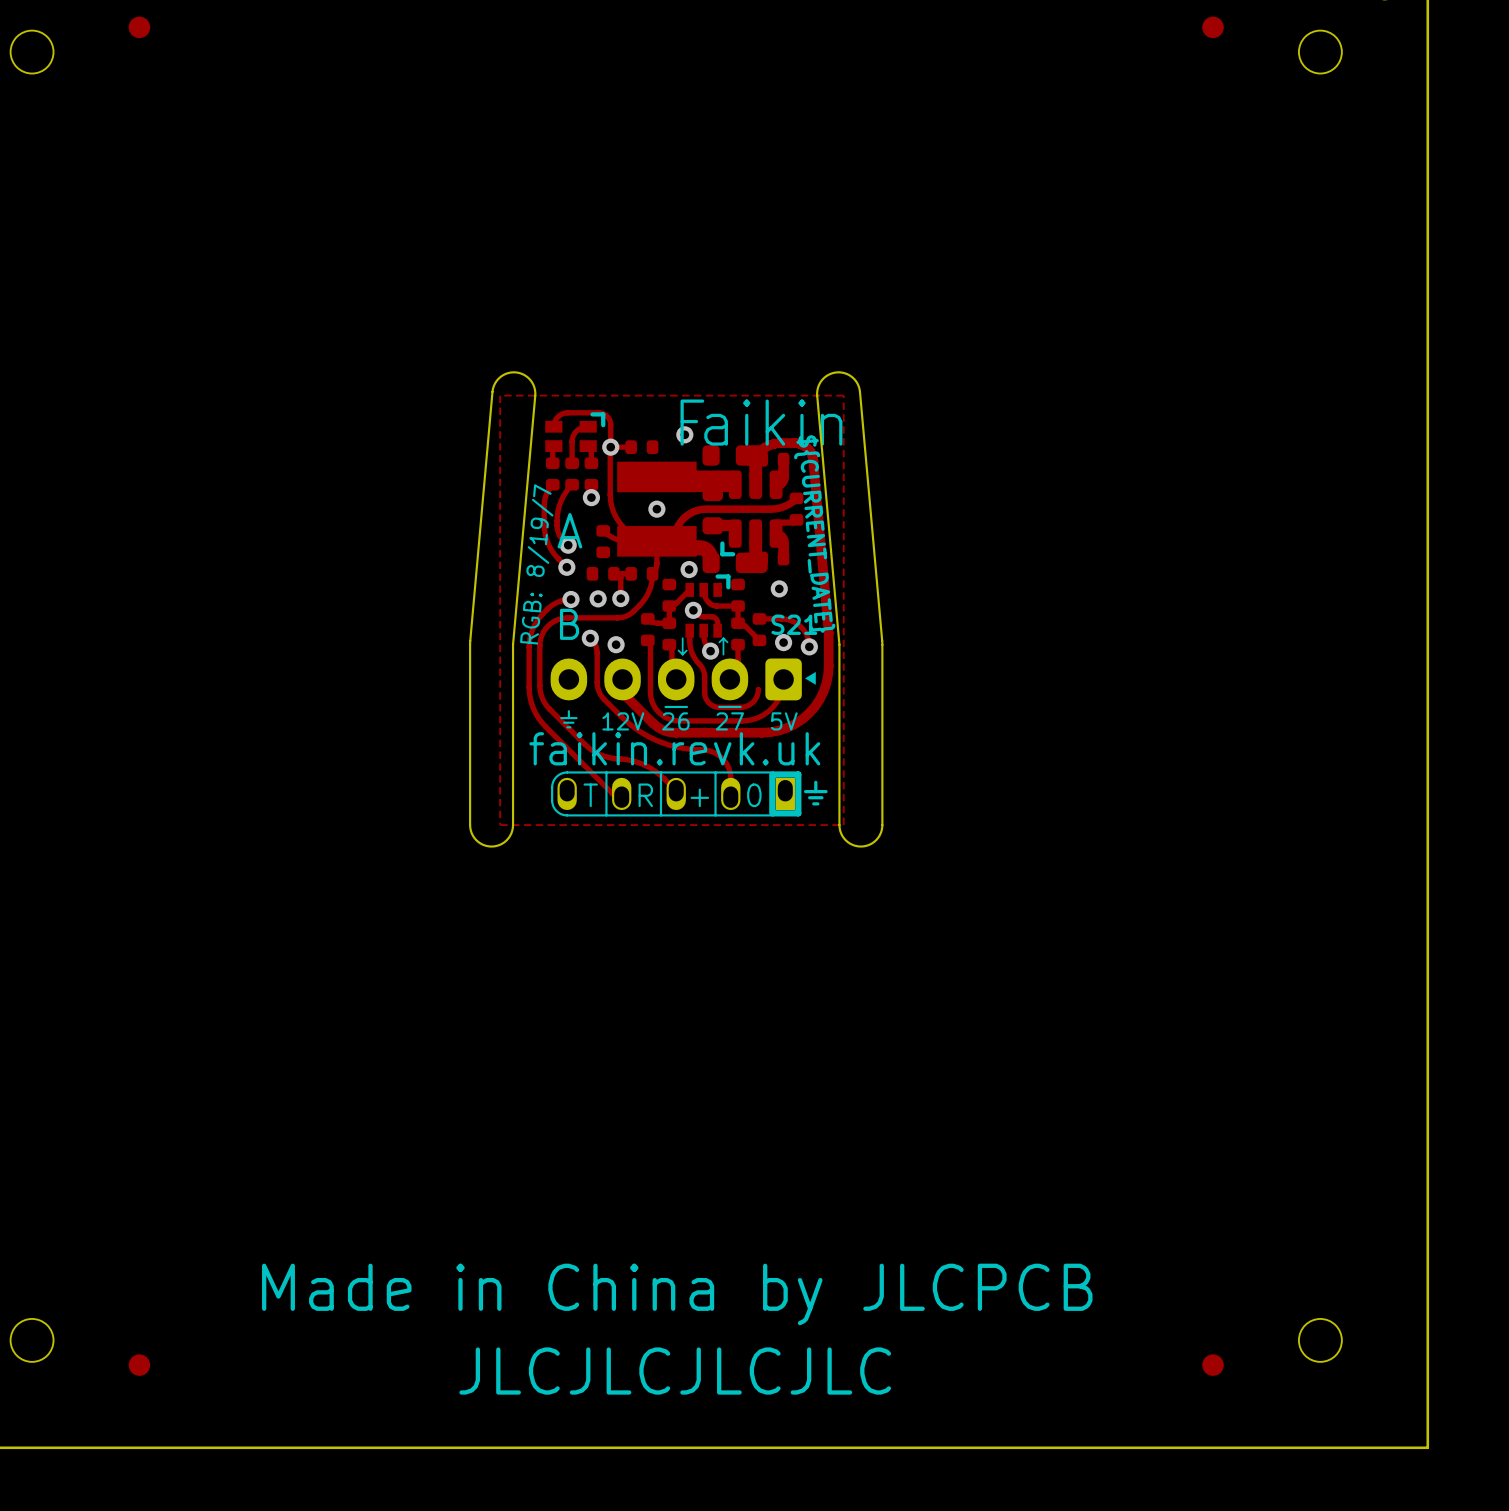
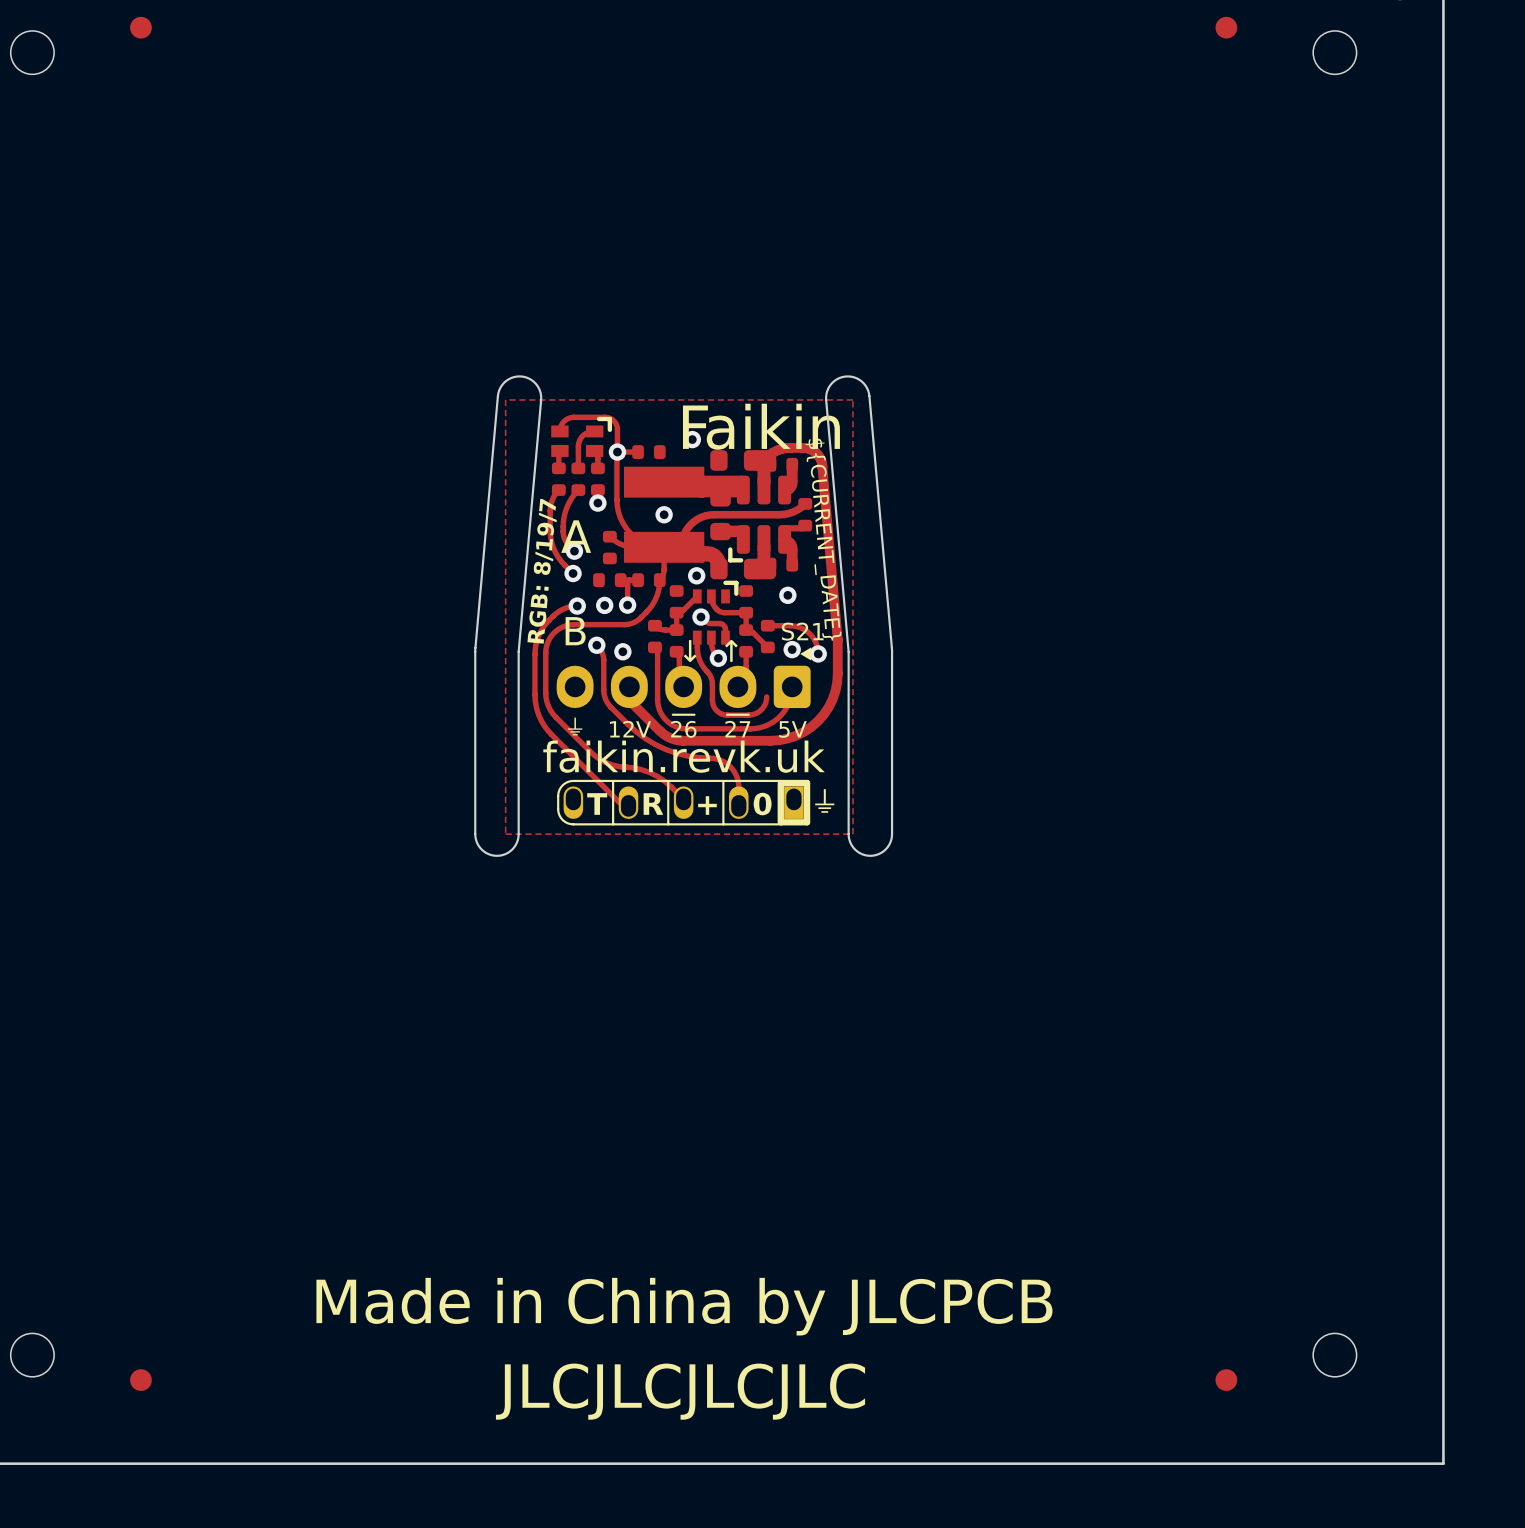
drawing position: (810, 678) -> (805, 653)

